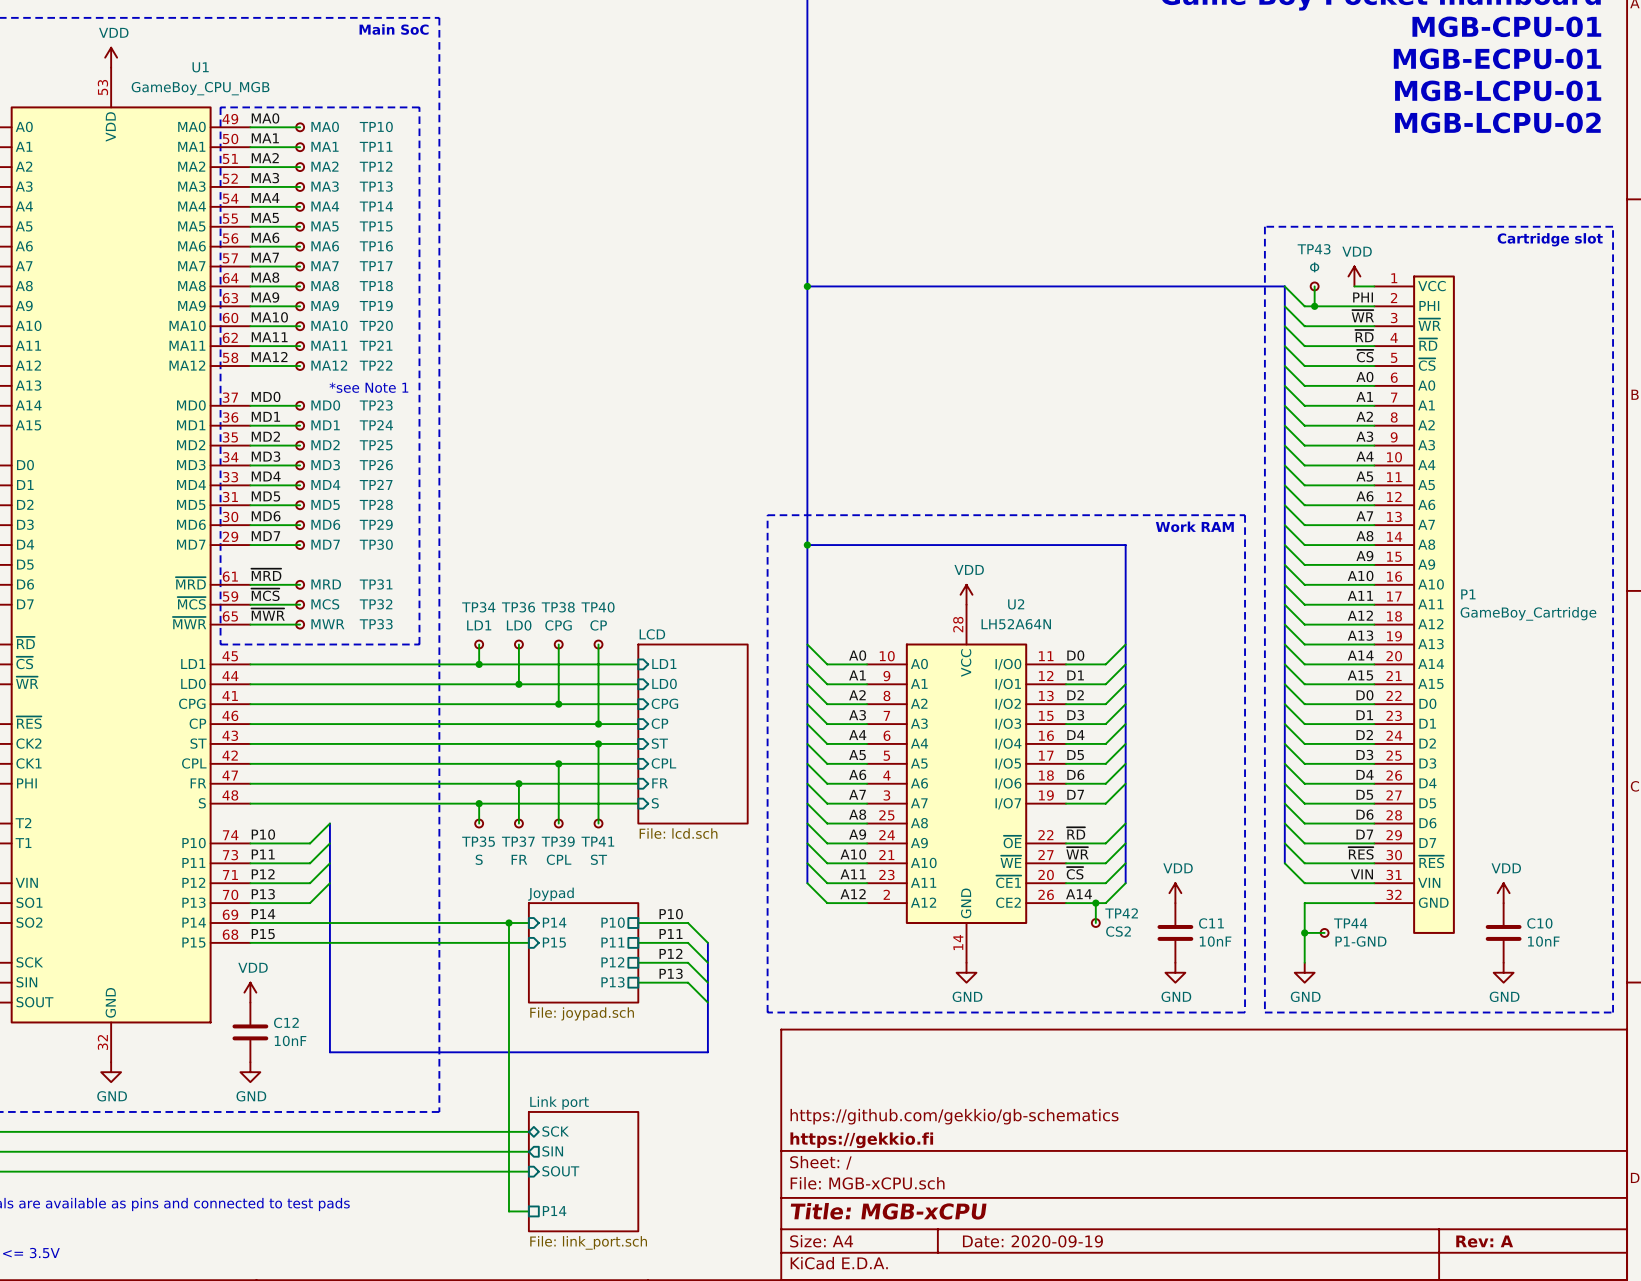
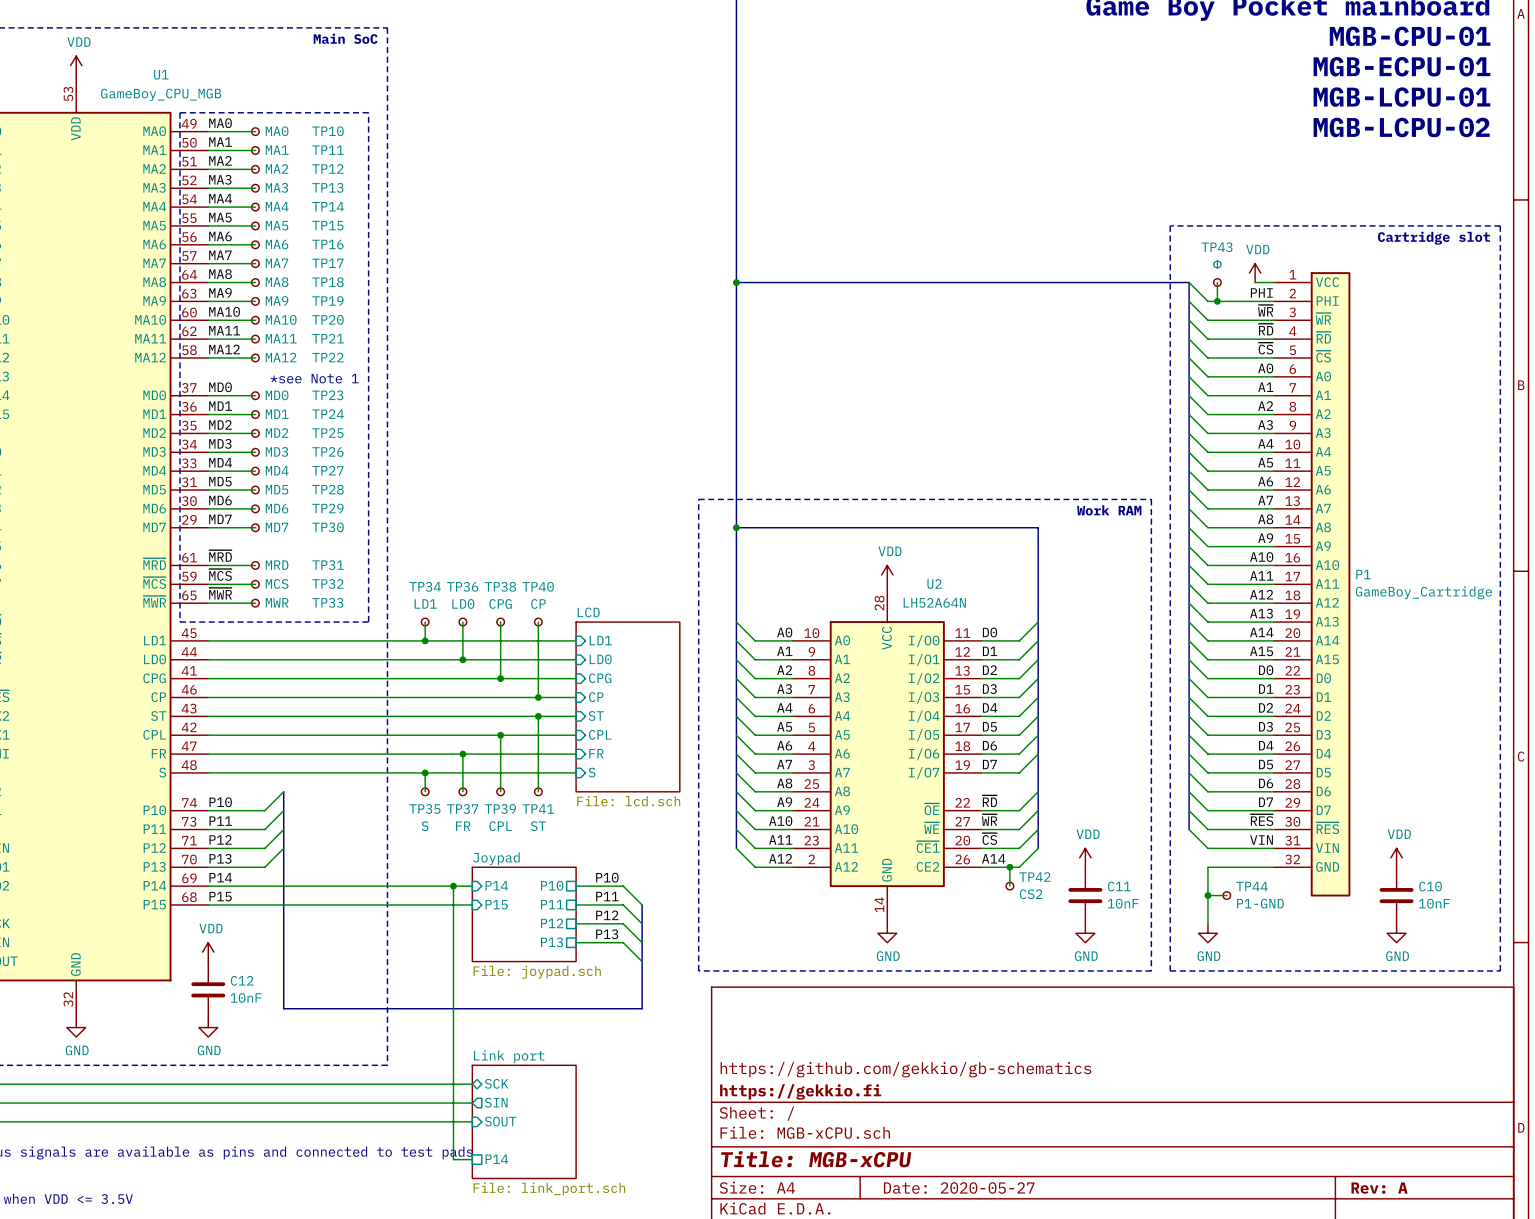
title block: Date: 2020-09-19 (1032, 1241) -> Date: 2020-05-27 (959, 1187)

